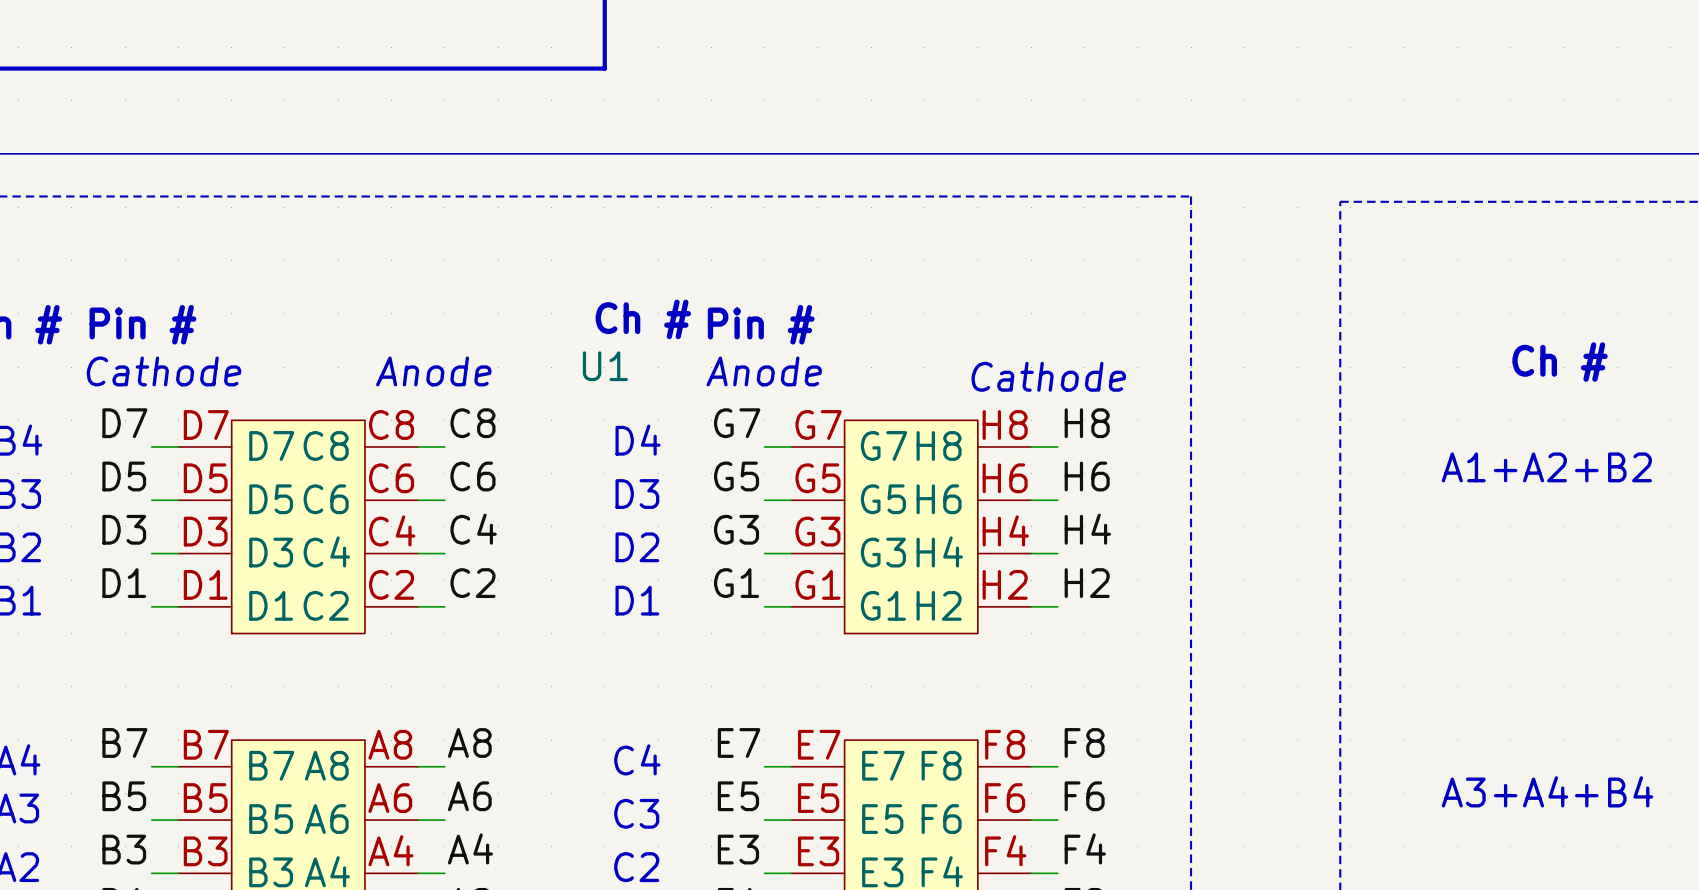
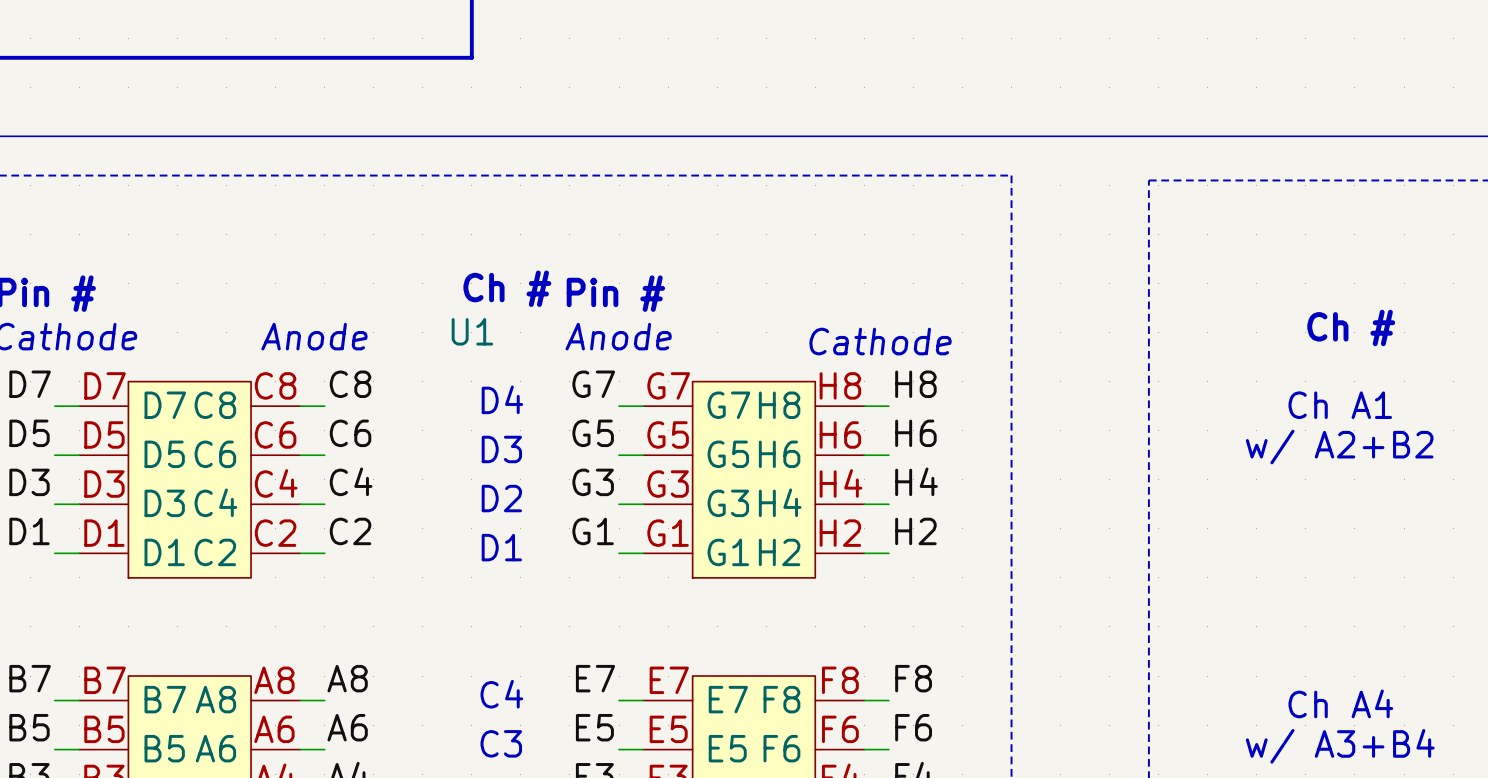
text: none -> Ch A1 (1340, 405)
text: A1+A2+B2 (1546, 467) -> w/ A2+B2 (1339, 447)
text: none -> Ch A4 (1340, 703)
text: A3+A4+B4 (1547, 791) -> w/ A3+B4 (1340, 746)

